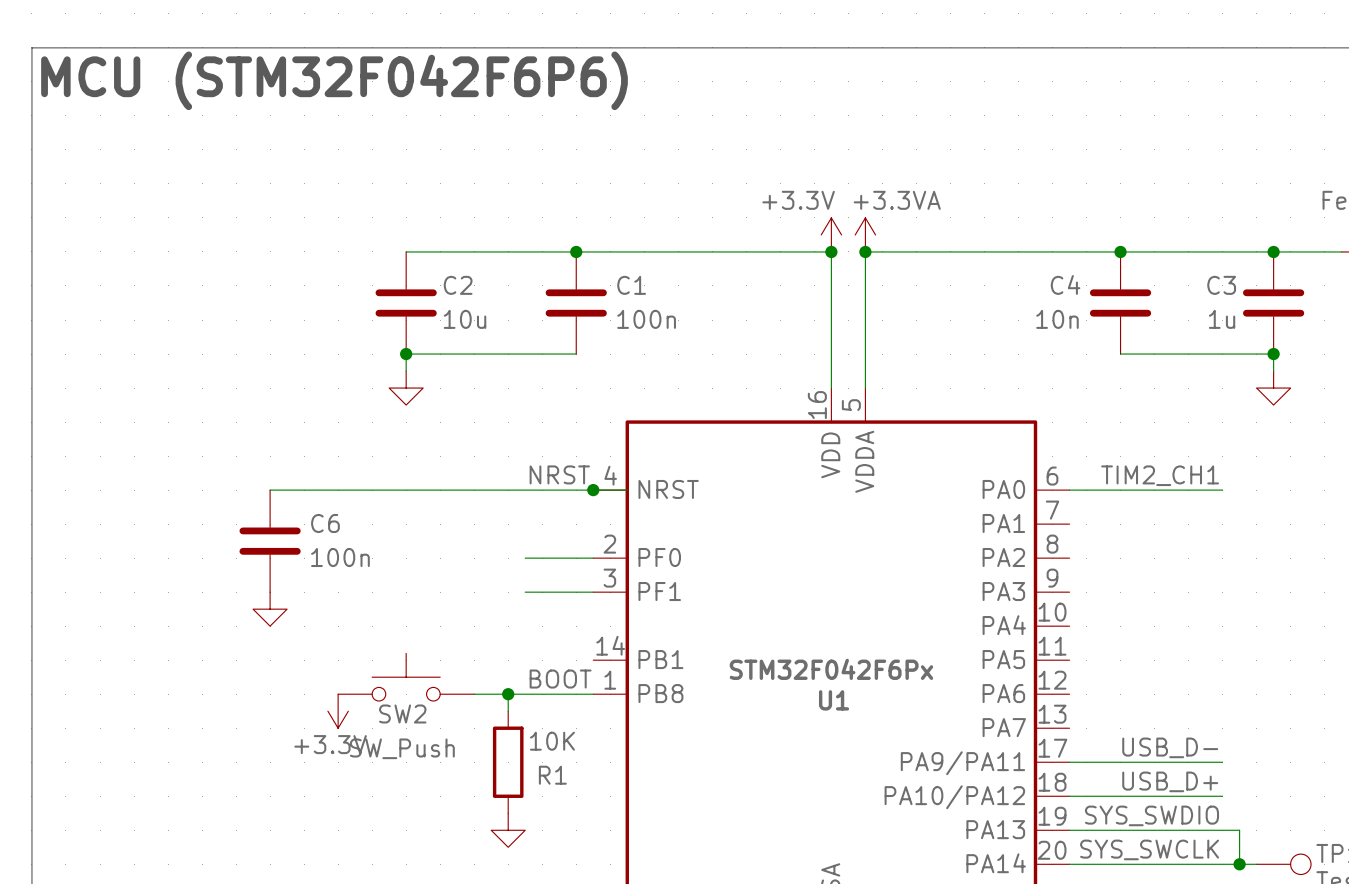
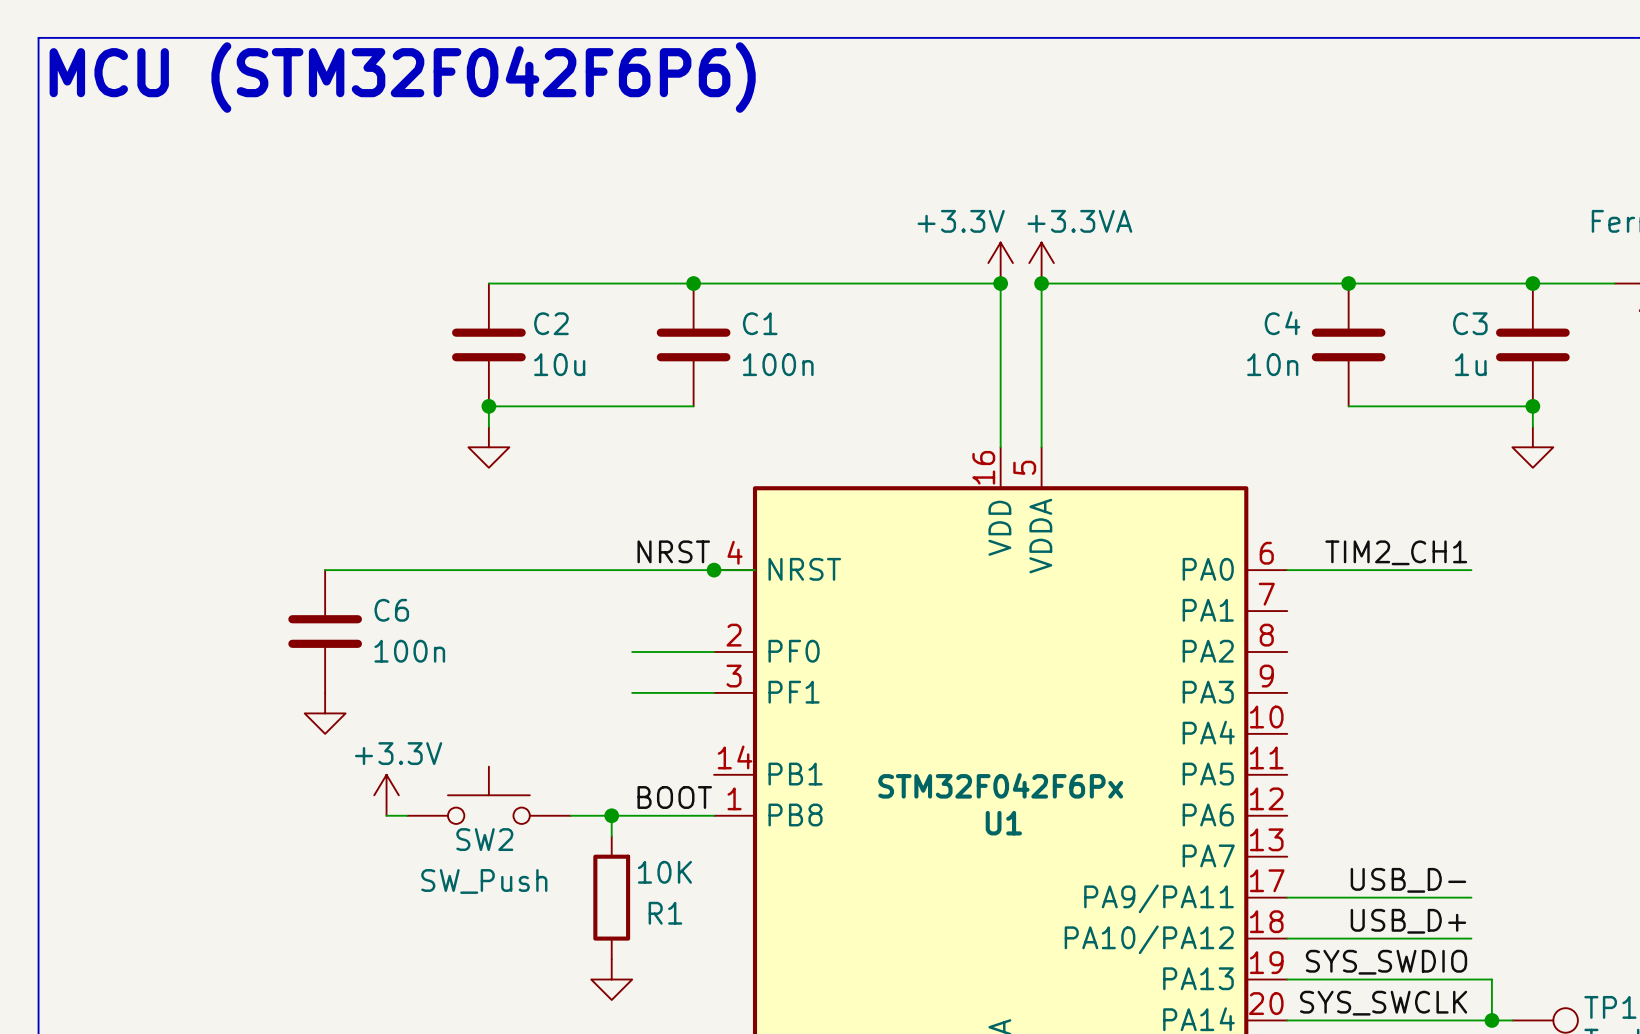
wire: none -> (386, 815) (407, 815)
power symbol rotation: 0° (338, 711) -> 180° (386, 795)
power symbol position: +3.3V (338, 711) -> +3.3V (386, 795)

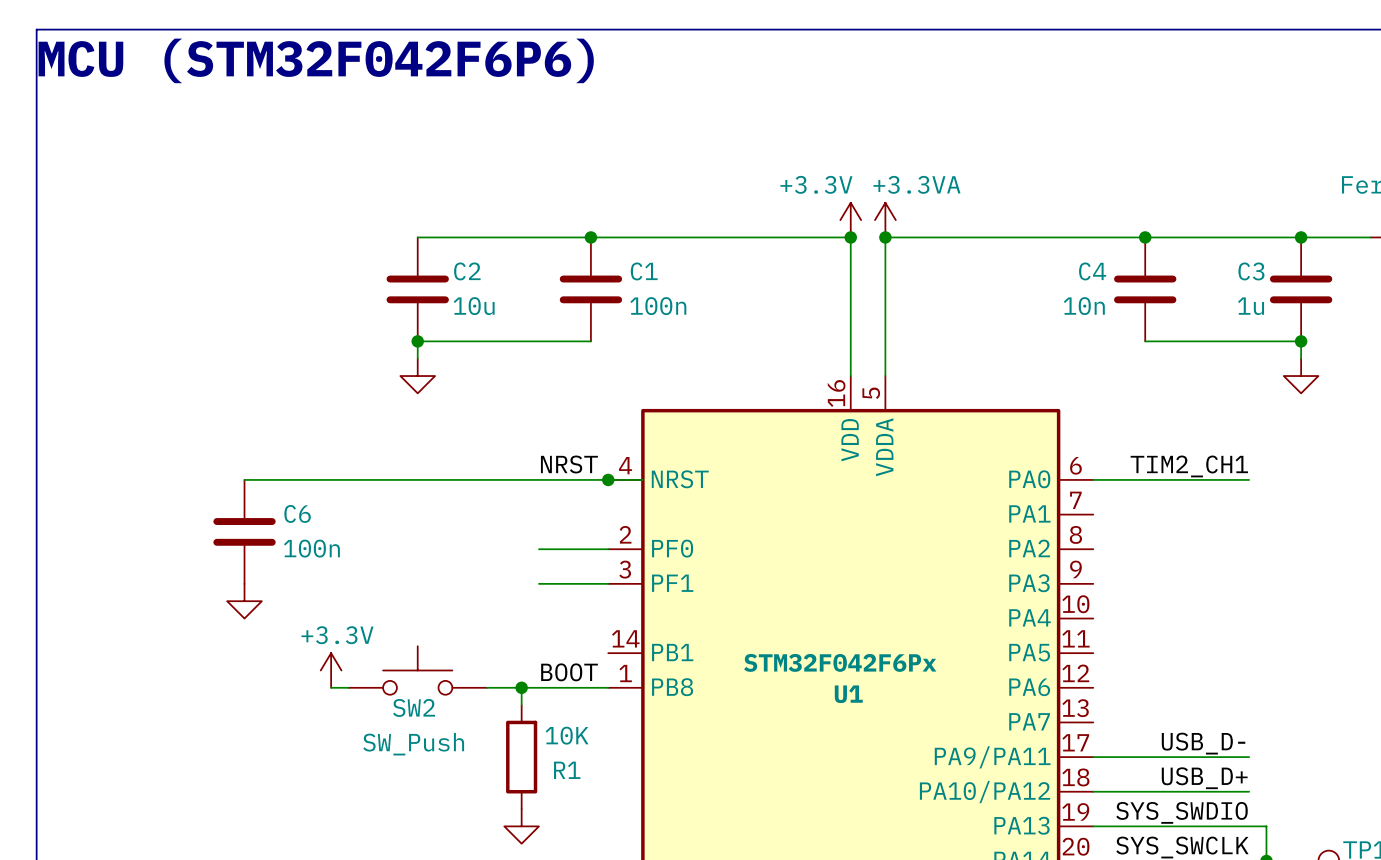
wire: none -> (244, 479) (279, 479)
C6 position: (325, 631) -> (244, 531)
power symbol position: (325, 713) -> (244, 601)

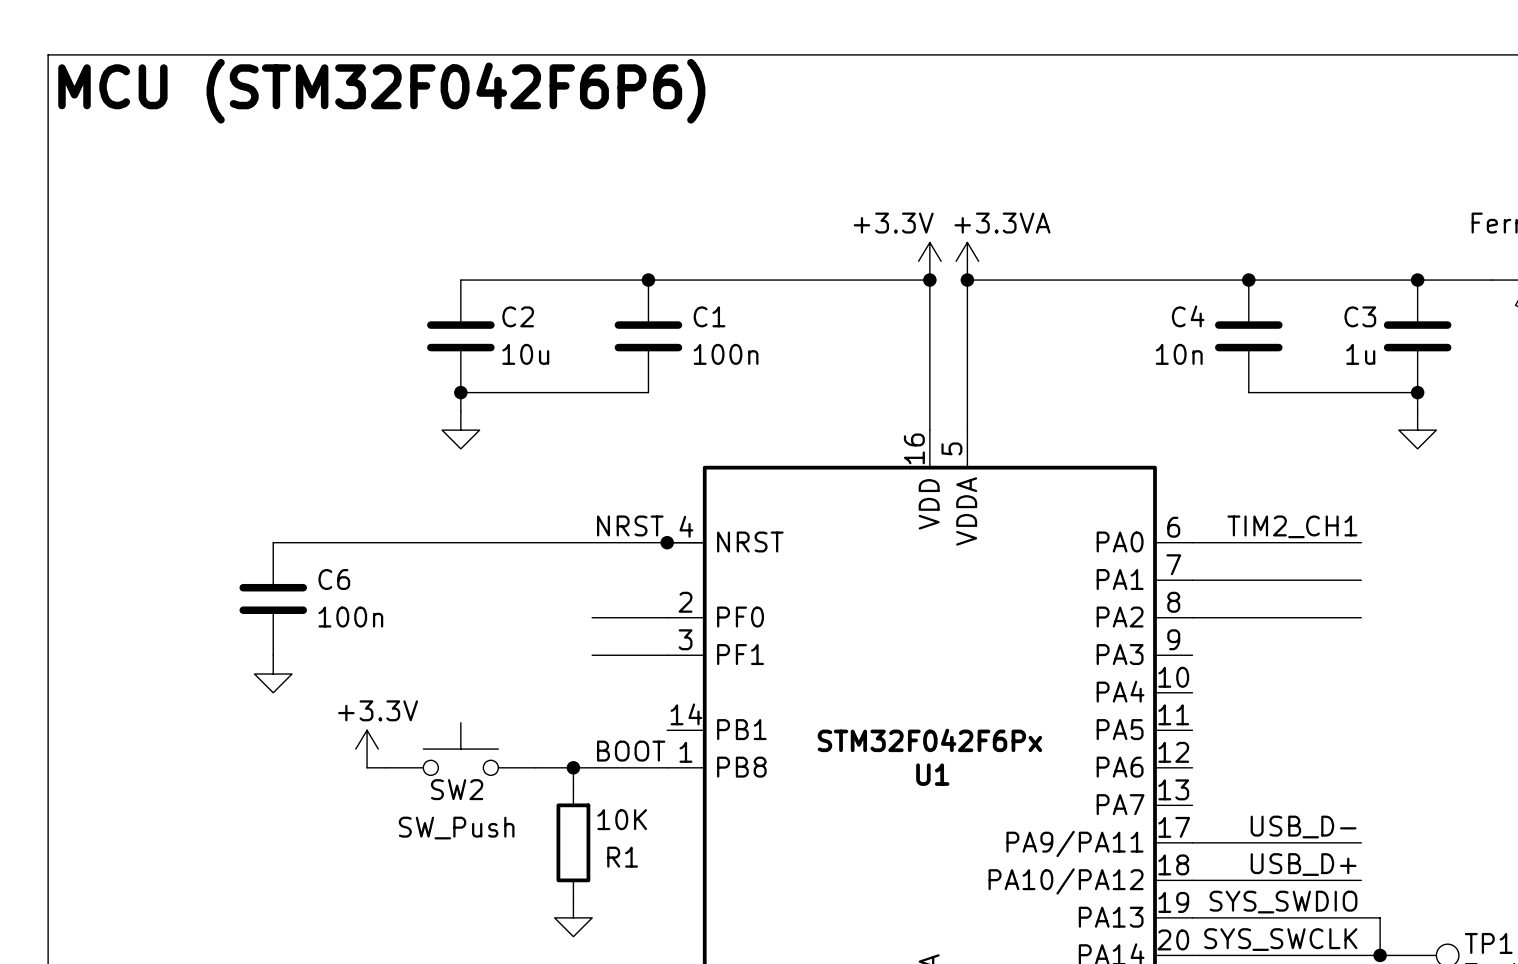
wire: none -> (1192, 580) (1361, 580)
wire: none -> (1192, 617) (1361, 617)

